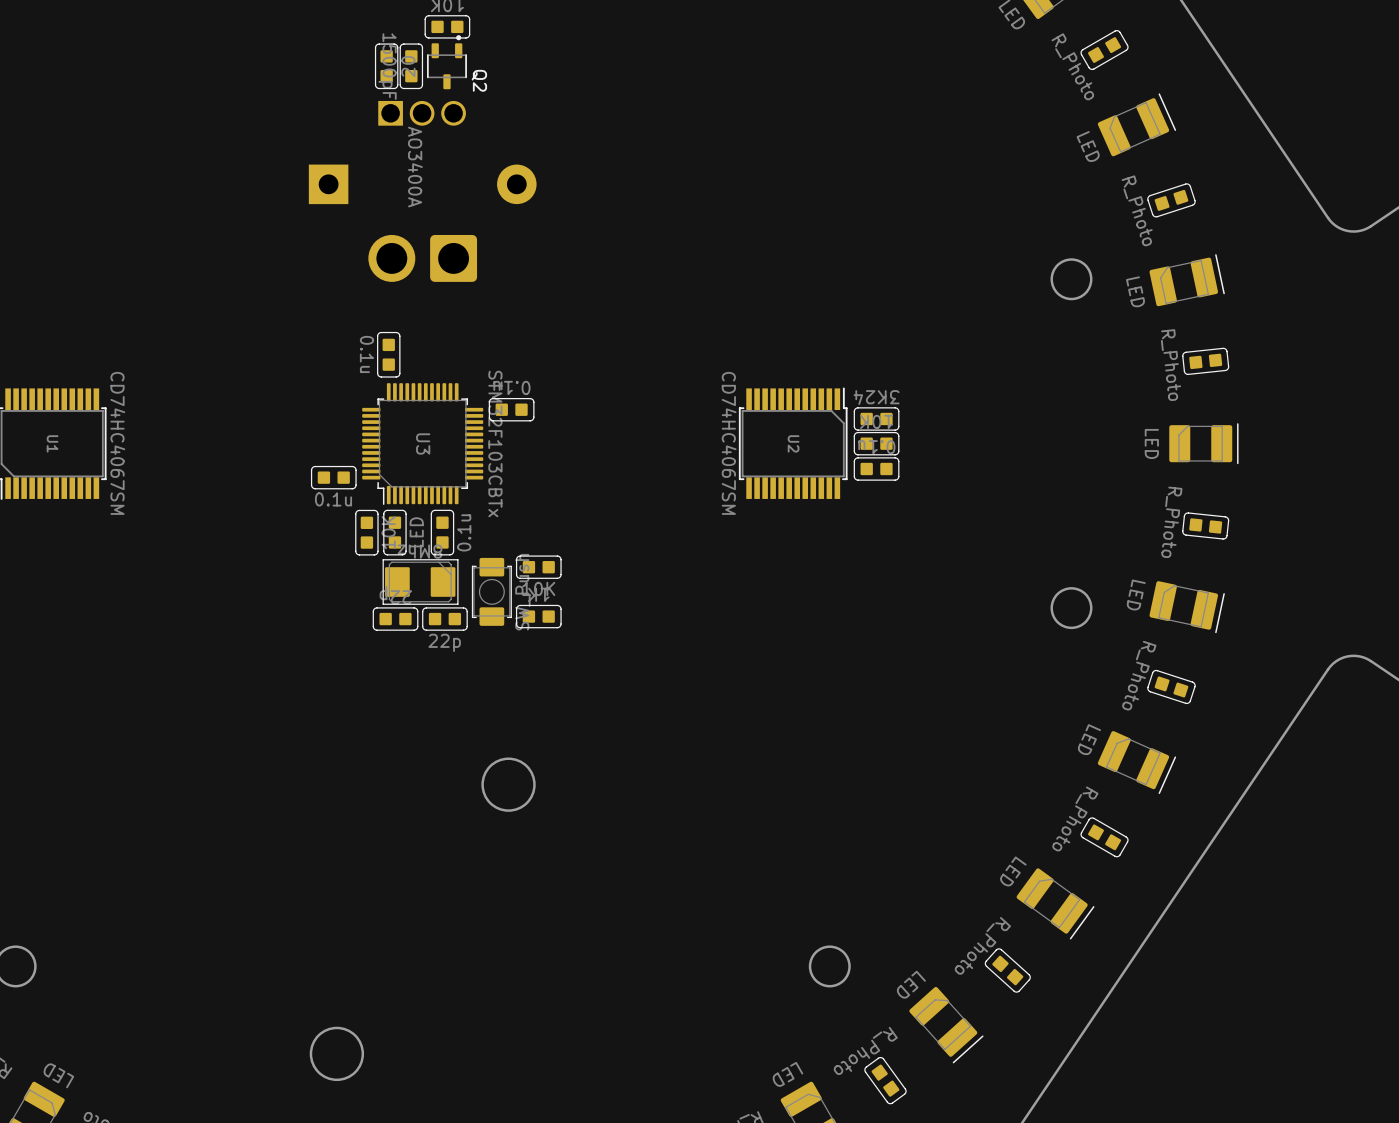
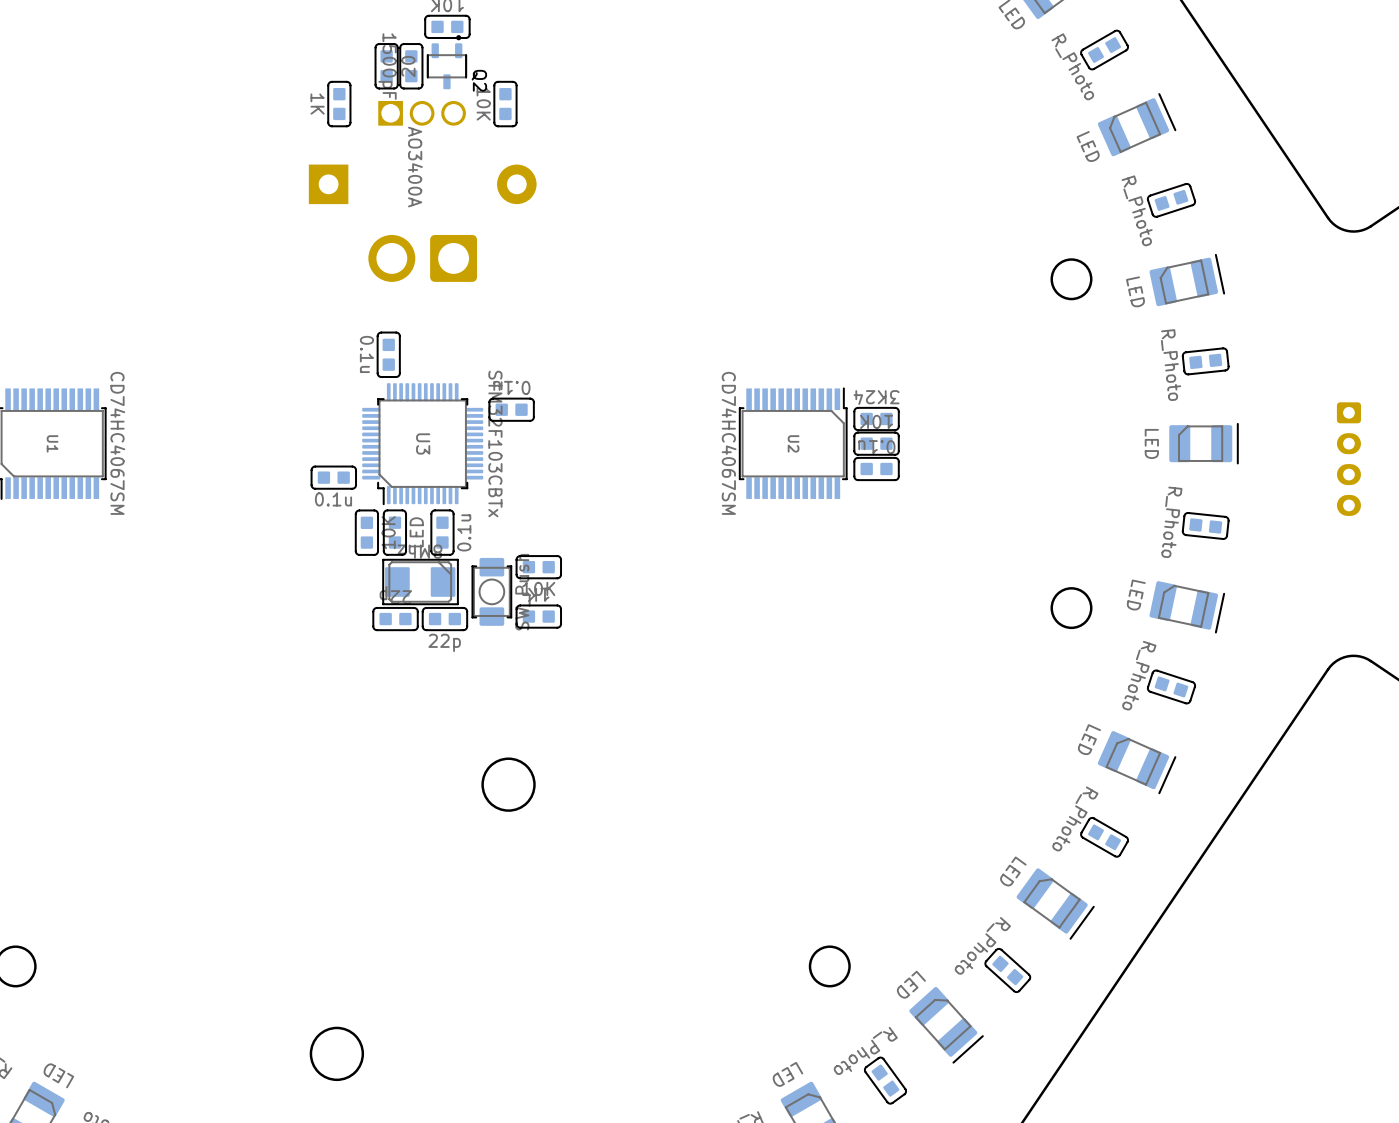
part: none -> 1K (339, 104)
part: none -> 10K (505, 104)
part: none -> (1348, 459)

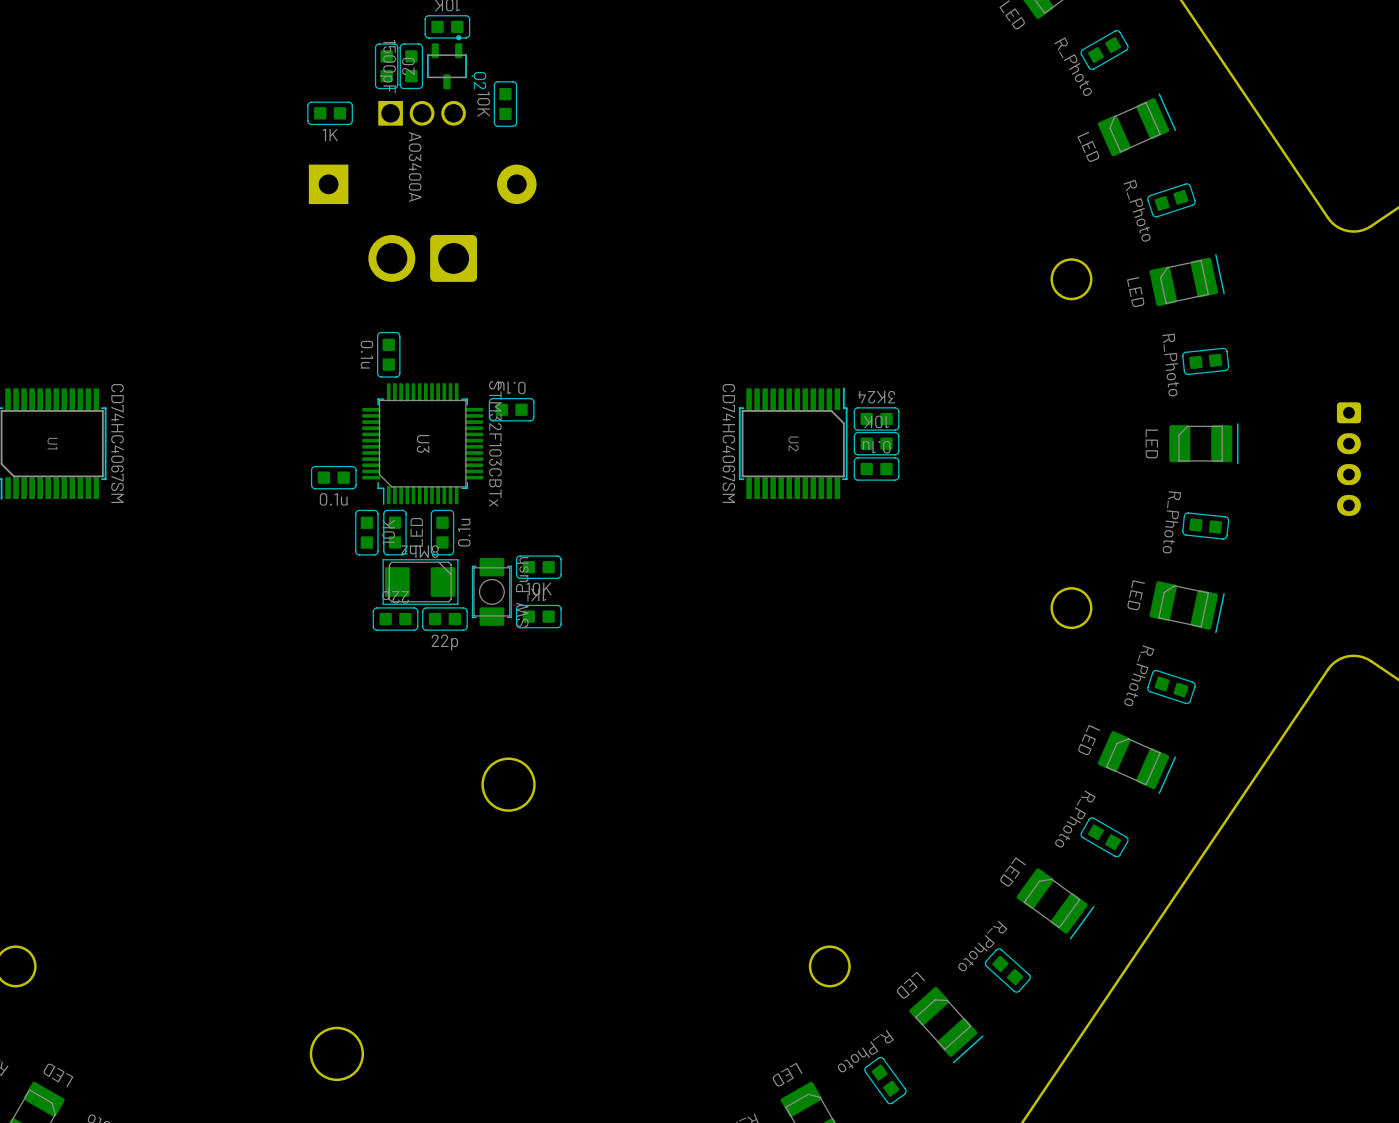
part value position: 1K (317, 104) -> 1K (330, 135)
part rotation: 0° (339, 104) -> 90° clockwise (330, 113)

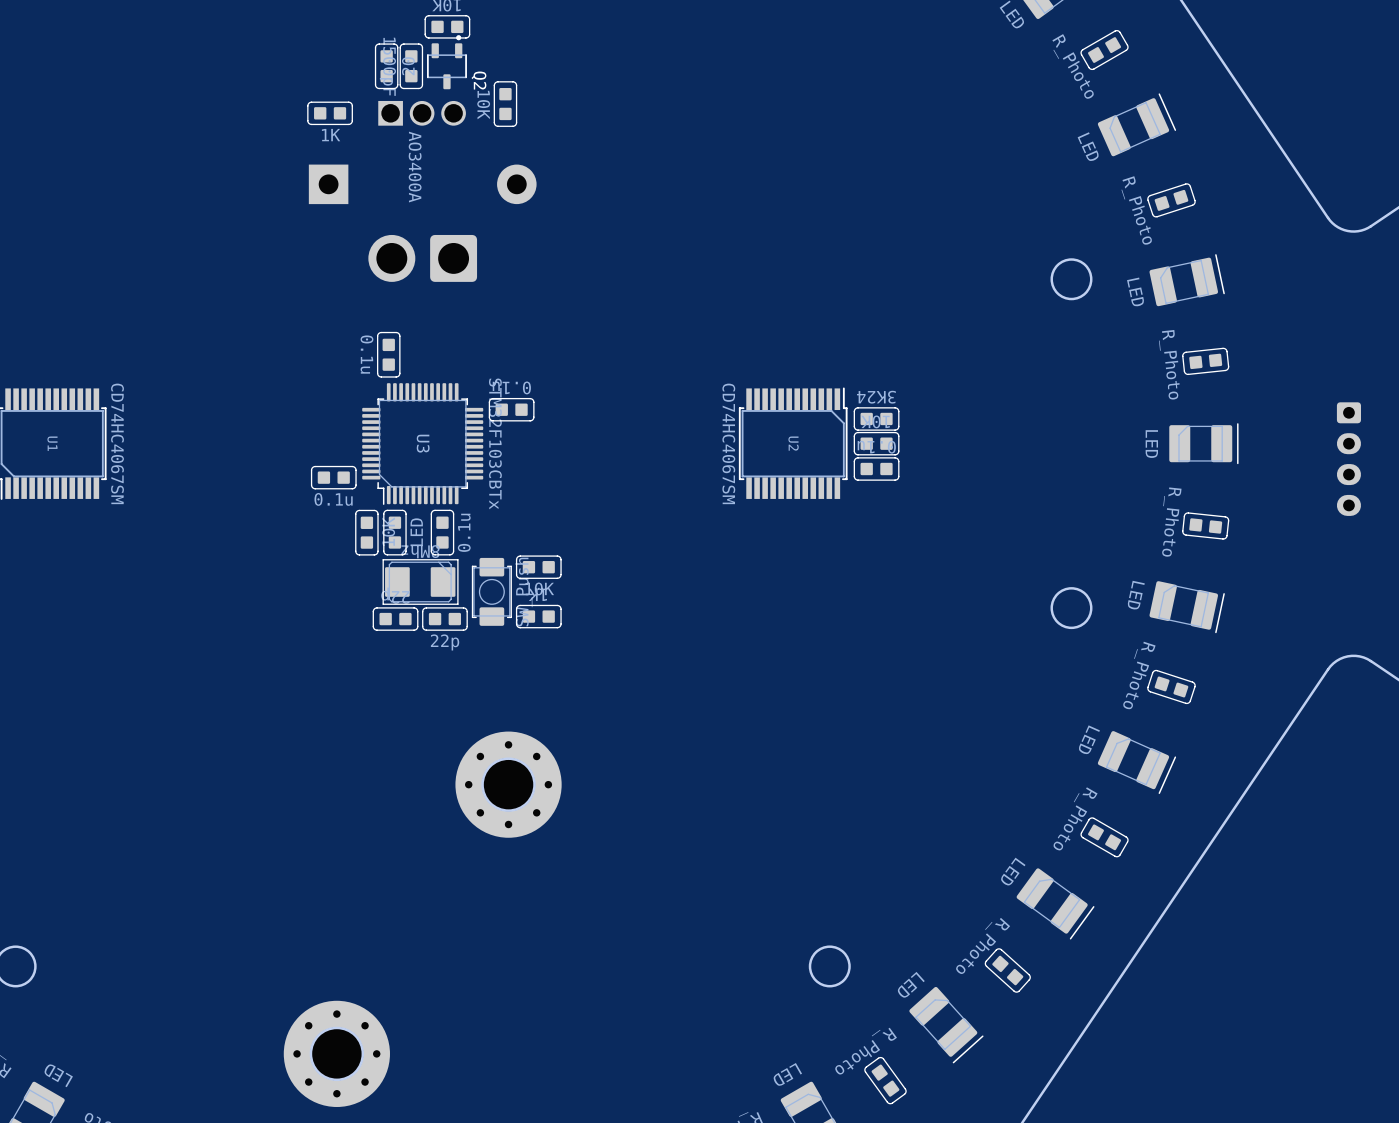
part: none -> (508, 784)
part: none -> (336, 1053)

